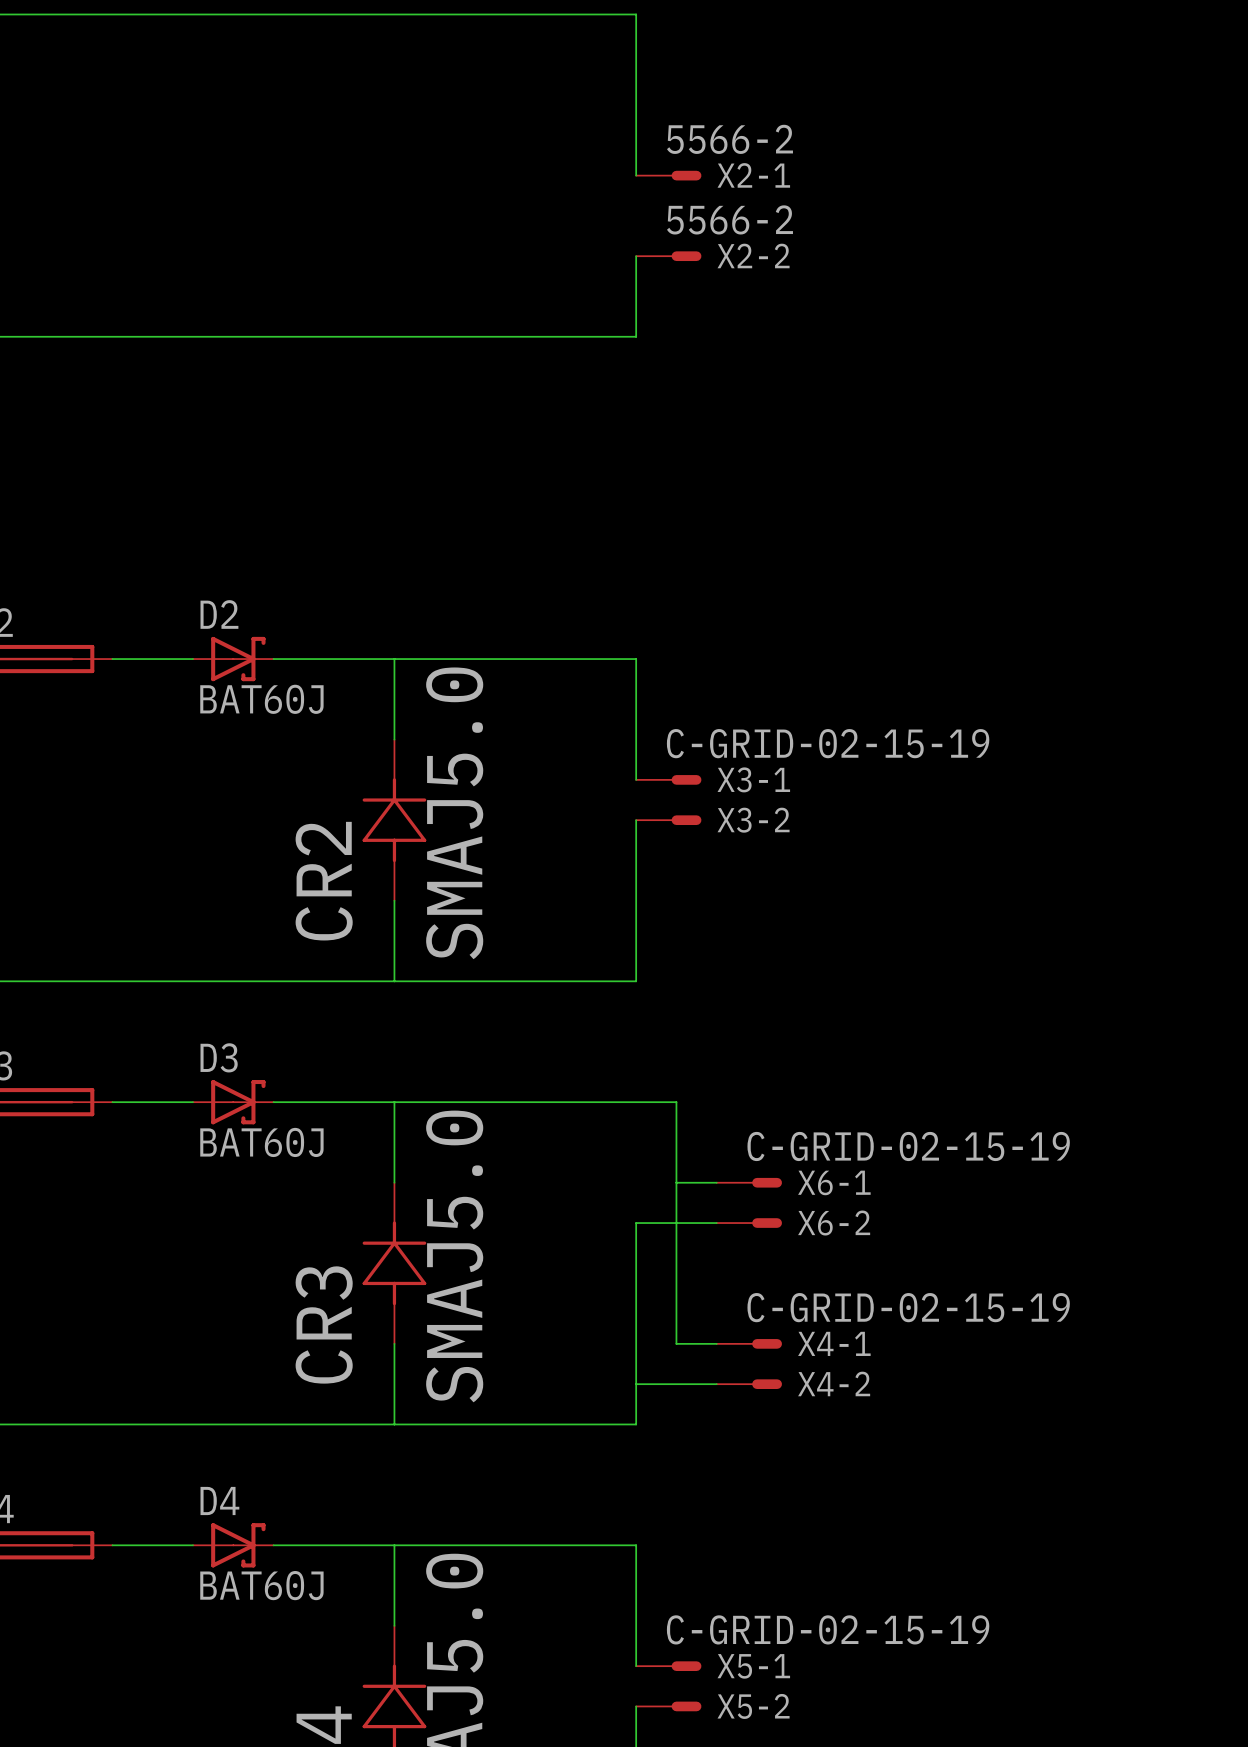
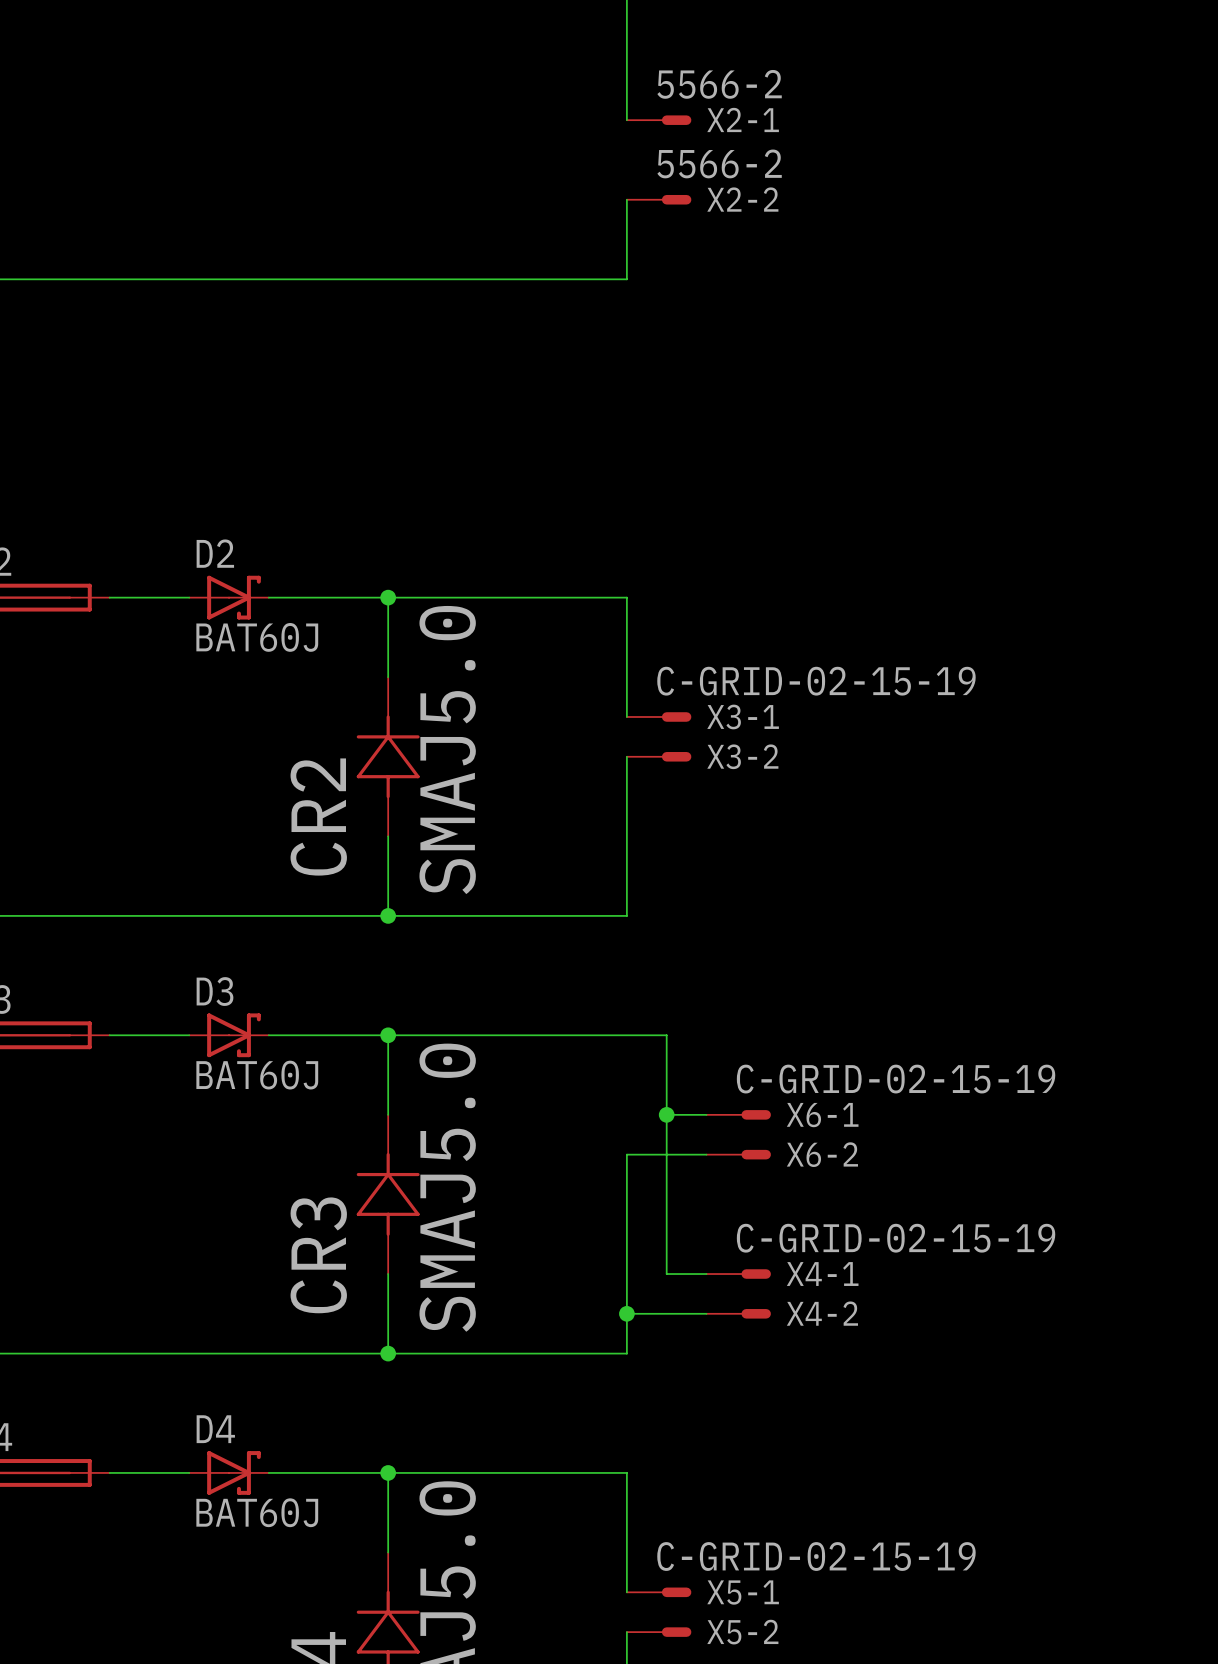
junction: none -> (388, 597)
junction: none -> (388, 915)
junction: none -> (388, 1035)
junction: none -> (666, 1114)
junction: none -> (626, 1313)
junction: none -> (388, 1353)
junction: none -> (388, 1472)

